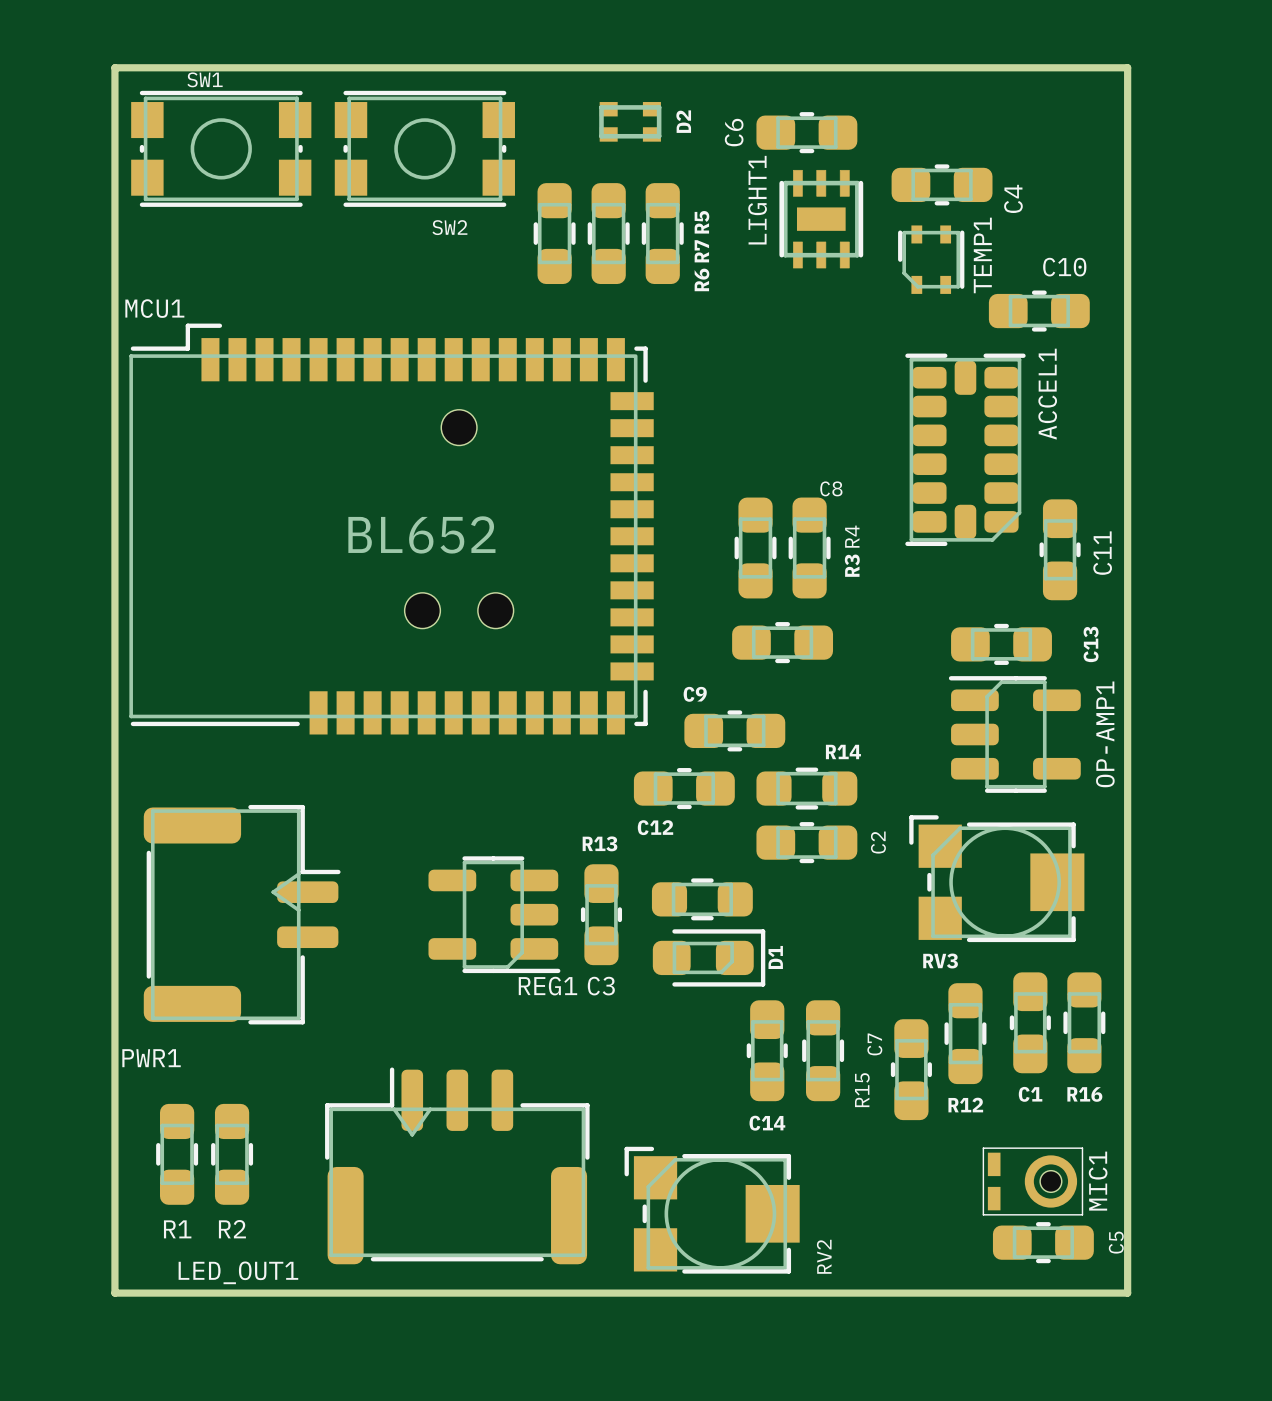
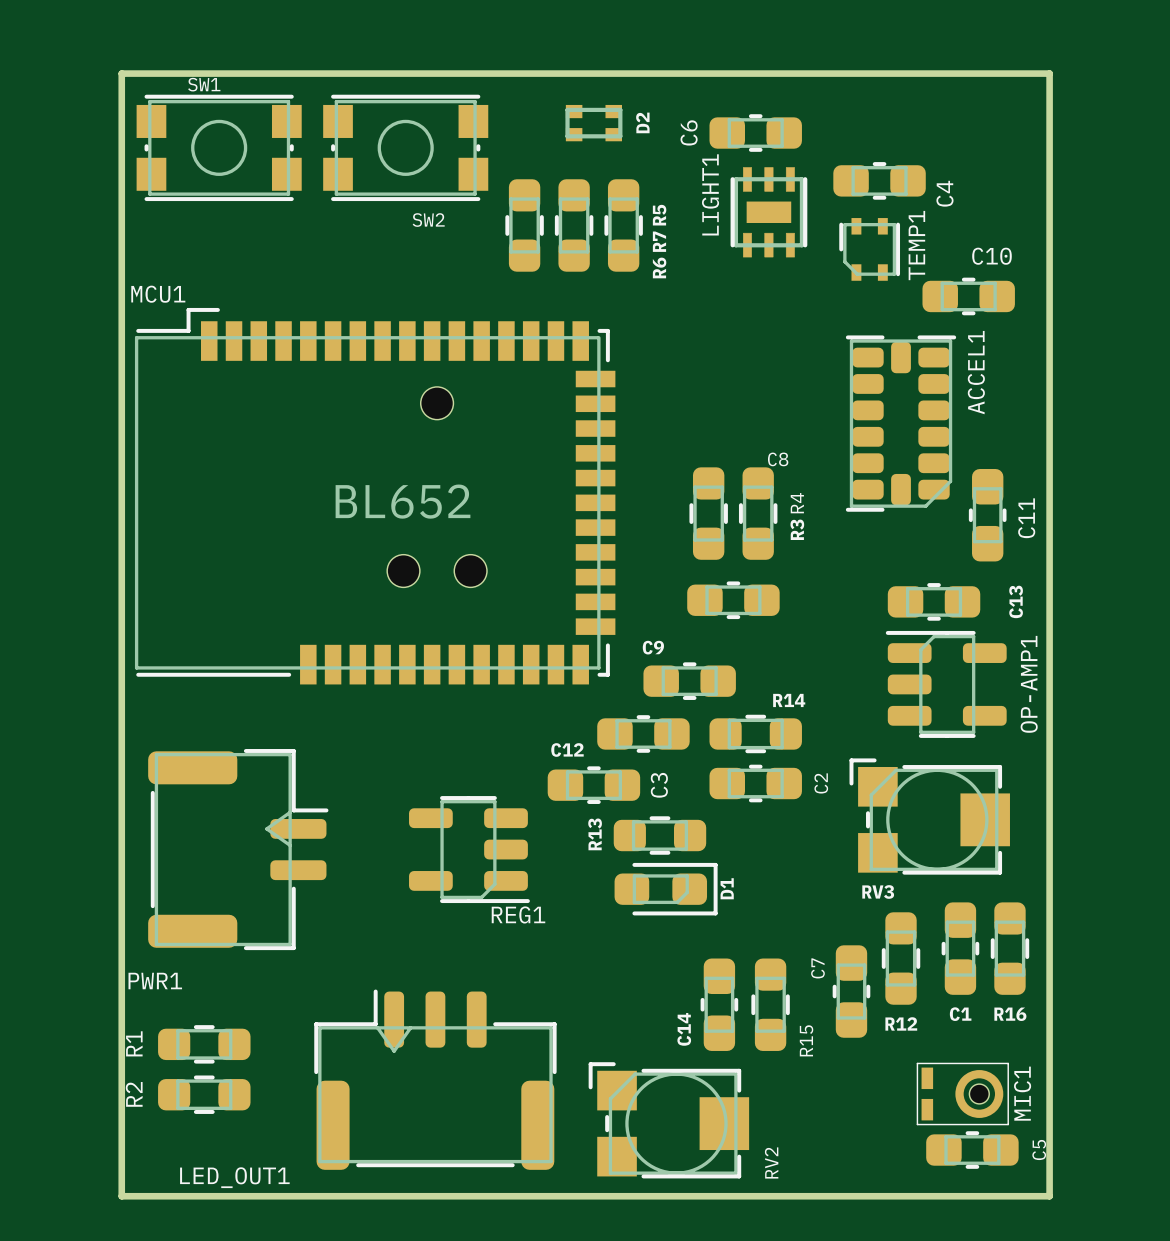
C12 name position: C12 (655, 827) -> C12 (567, 749)
R13 name rotation: 0° (599, 843) -> 90° counterclockwise (595, 834)
R13 name position: R13 (599, 843) -> R13 (595, 834)
C3 rotation: 0° (601, 914) -> 90° clockwise (593, 785)
C3 position: (601, 914) -> (593, 785)
C3 name position: C3 (601, 986) -> C3 (659, 785)
C14 position: (767, 1050) -> (719, 1004)
R15 position: (823, 1050) -> (770, 1004)
C14 name rotation: 0° (767, 1123) -> 90° counterclockwise (684, 1029)
R1 rotation: 0° (177, 1154) -> 90° clockwise (204, 1044)
R2 rotation: 0° (232, 1154) -> 90° clockwise (204, 1094)

